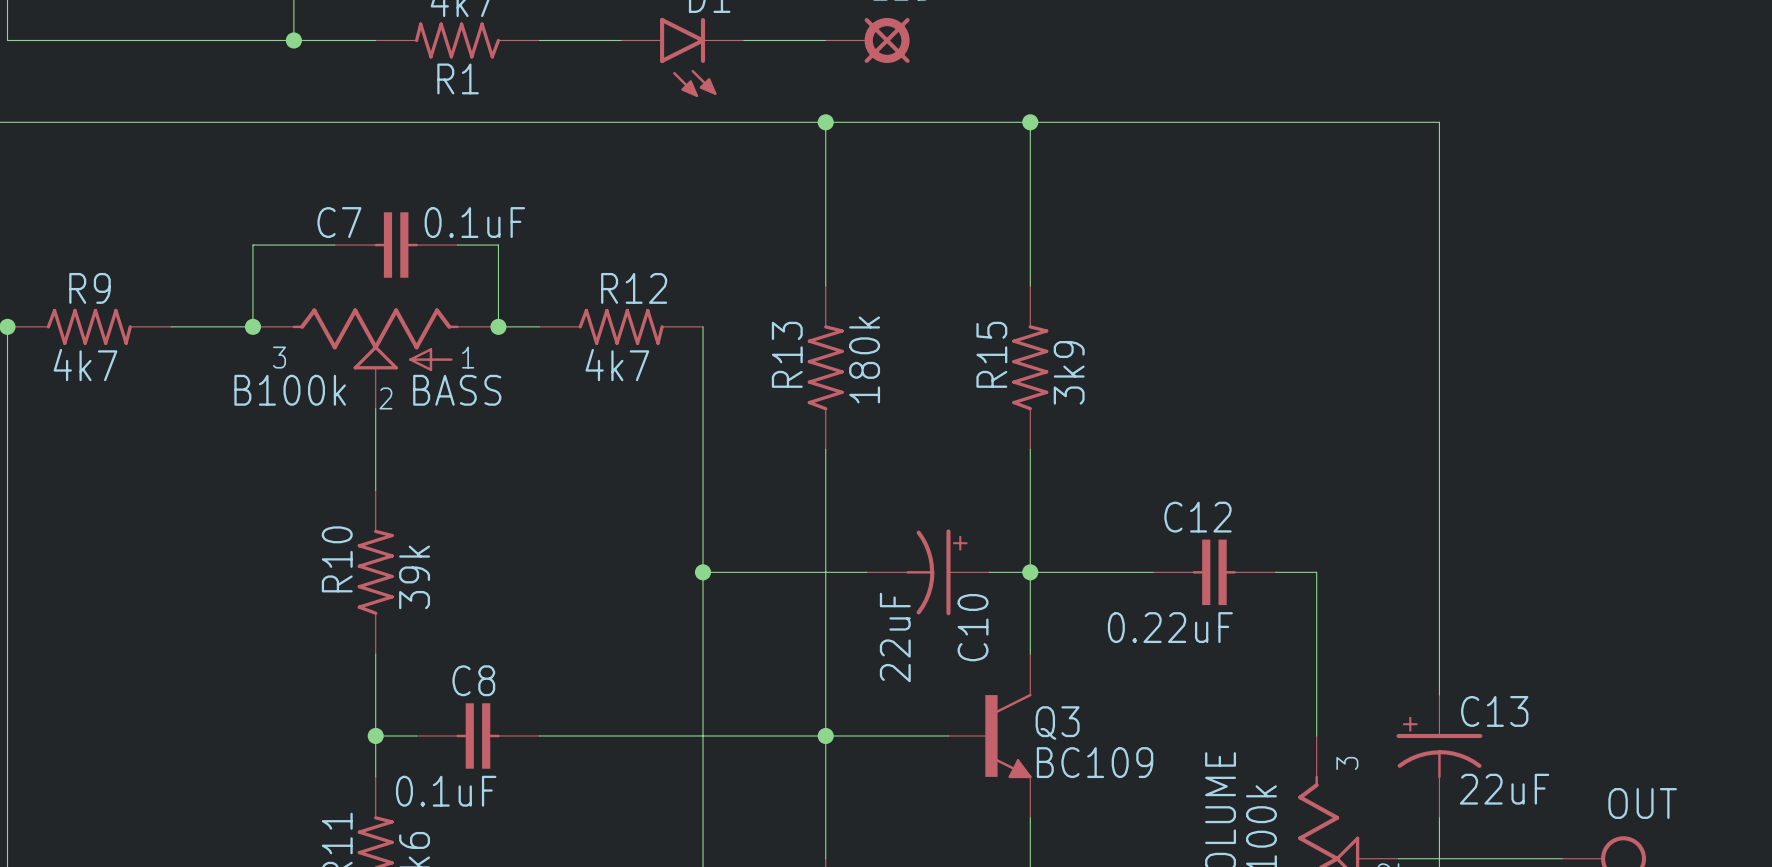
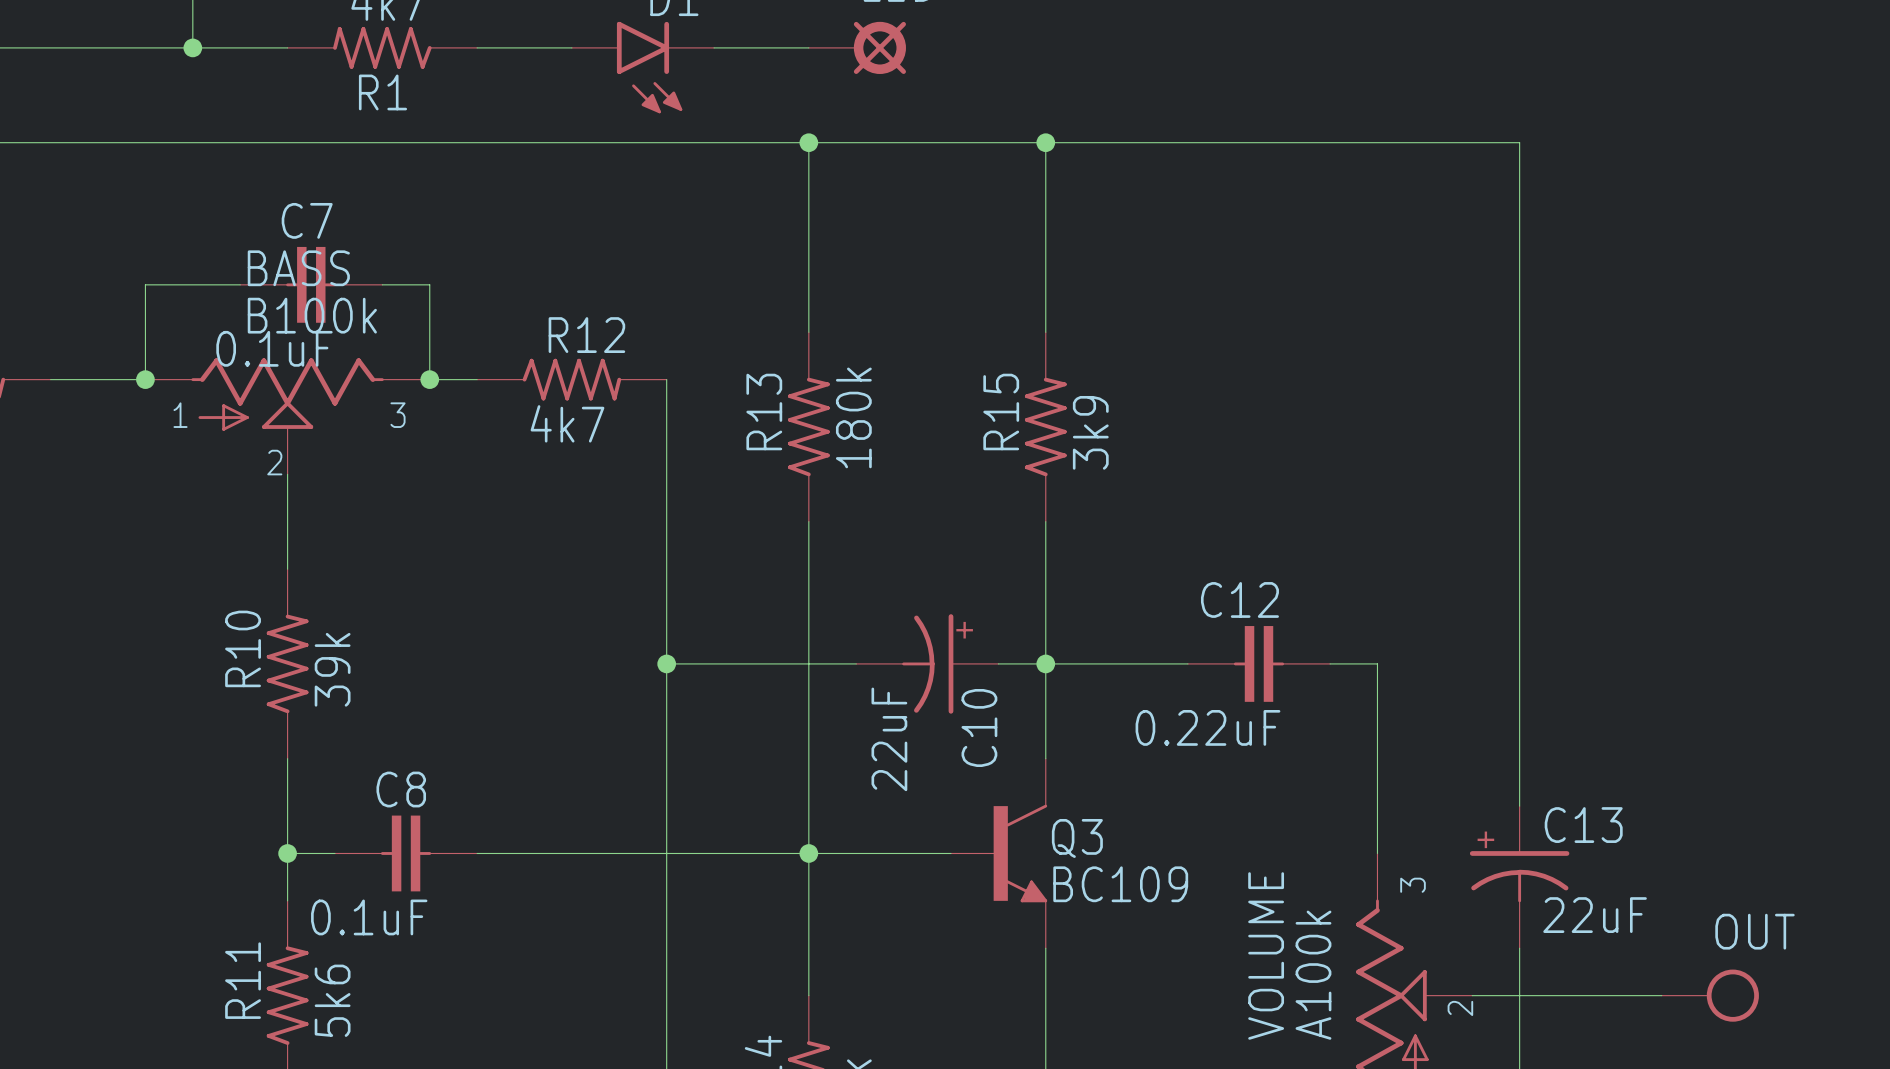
C7 name position: C7 (339, 222) -> C7 (307, 220)
C7 value position: 0.1uF (474, 222) -> 0.1uF (274, 348)
BASS flip: as is (375, 339) -> left-right (287, 394)
BASS value position: B100k (290, 390) -> B100k (312, 315)
BASS name position: BASS (457, 390) -> BASS (298, 268)

